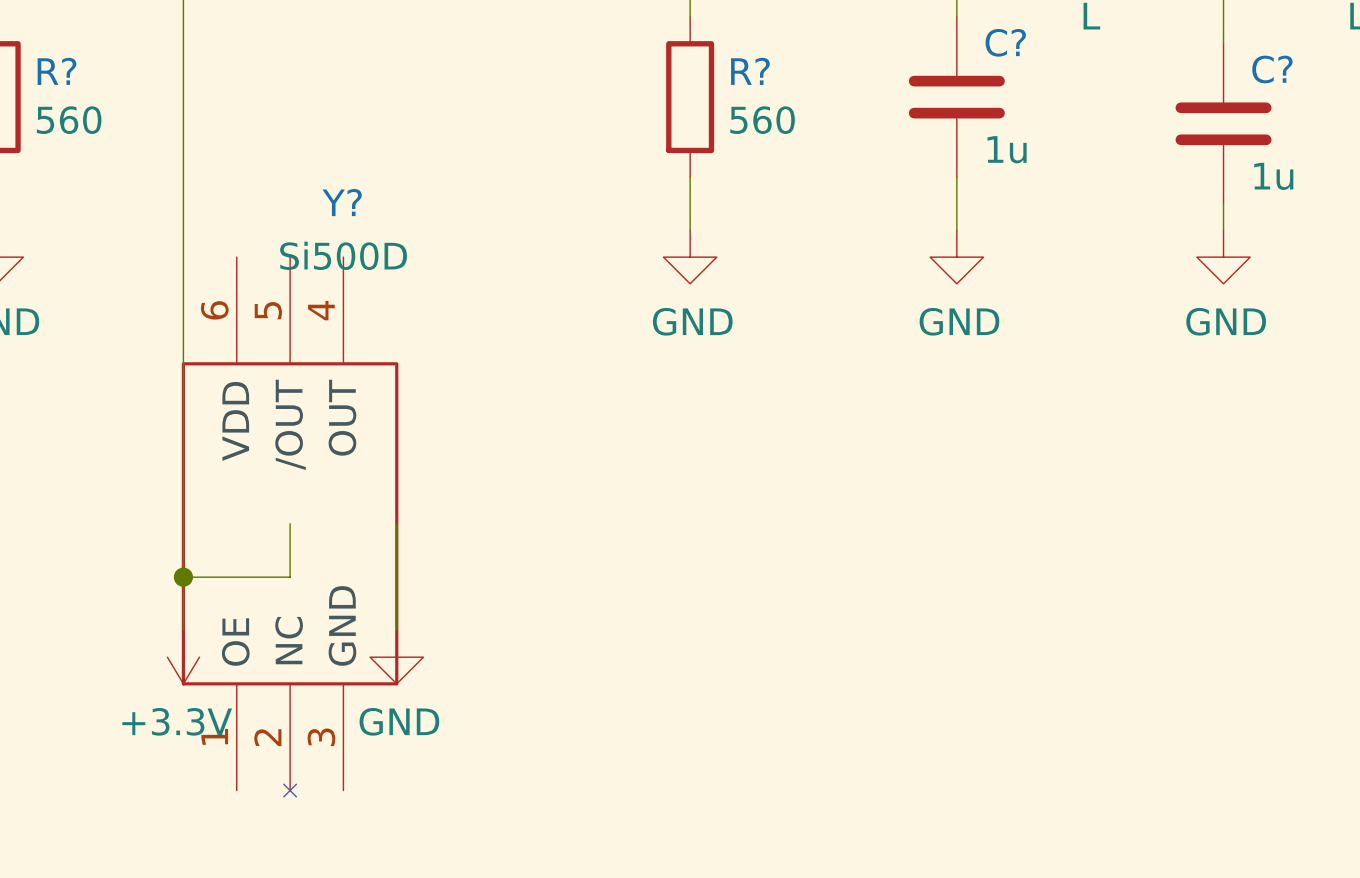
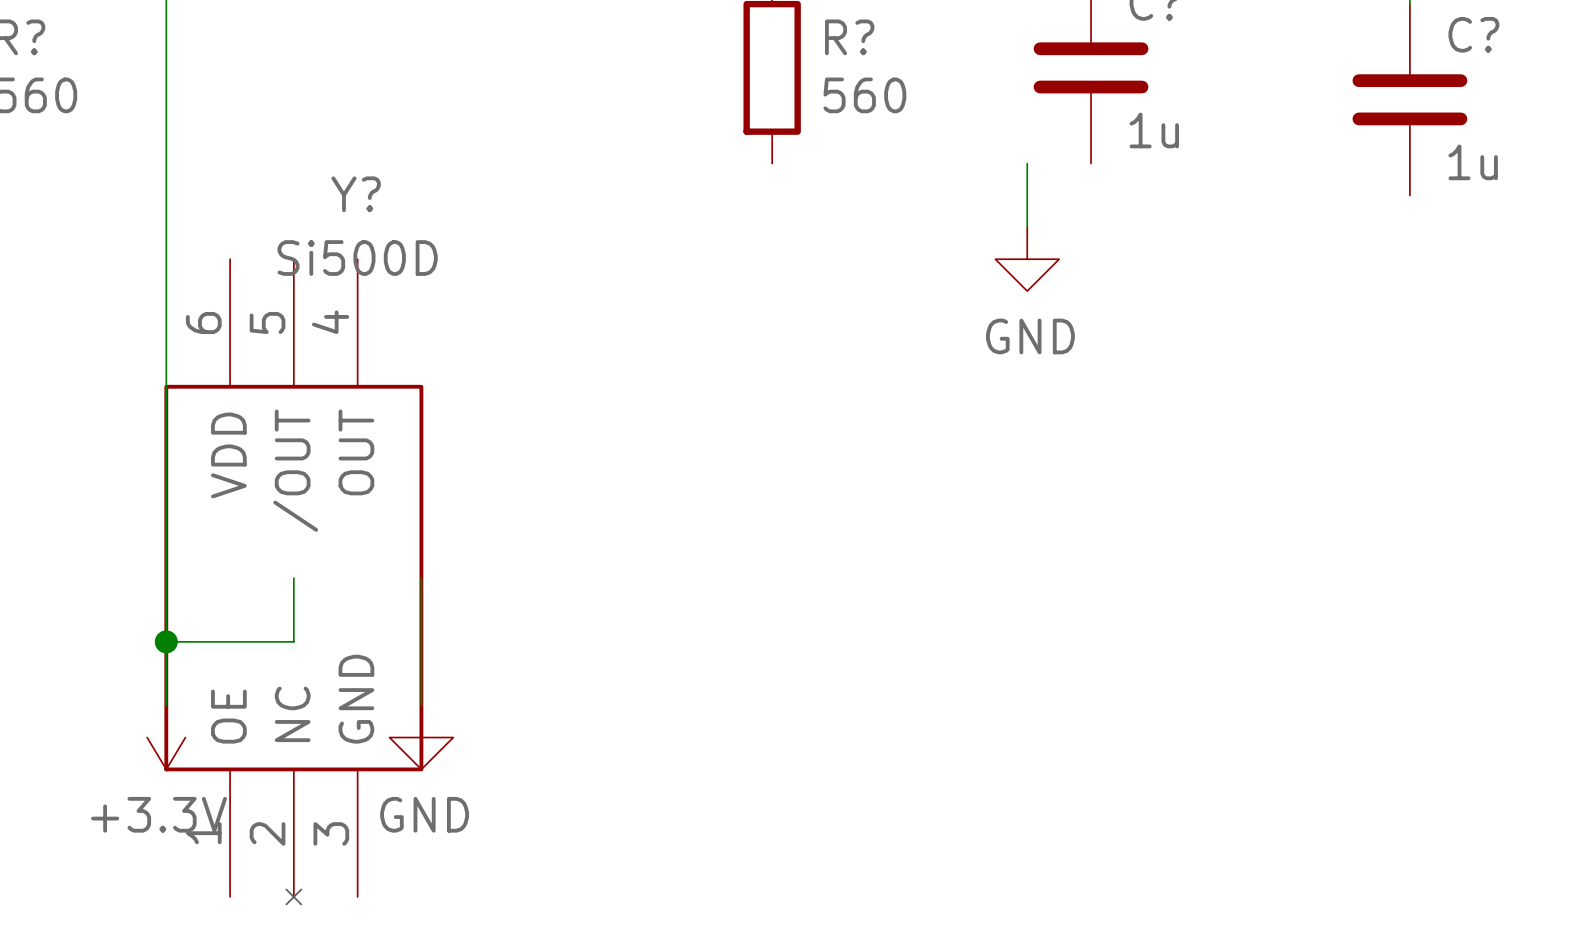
wire: (690, 177) (690, 230) -> (1027, 163) (1027, 227)
wire: (956, 177) (956, 230) -> none
wire: (1223, 203) (1223, 230) -> none
power symbol: GND (690, 257) -> none
power symbol position: GND (956, 257) -> GND (1027, 259)
power symbol: GND (1223, 257) -> none

